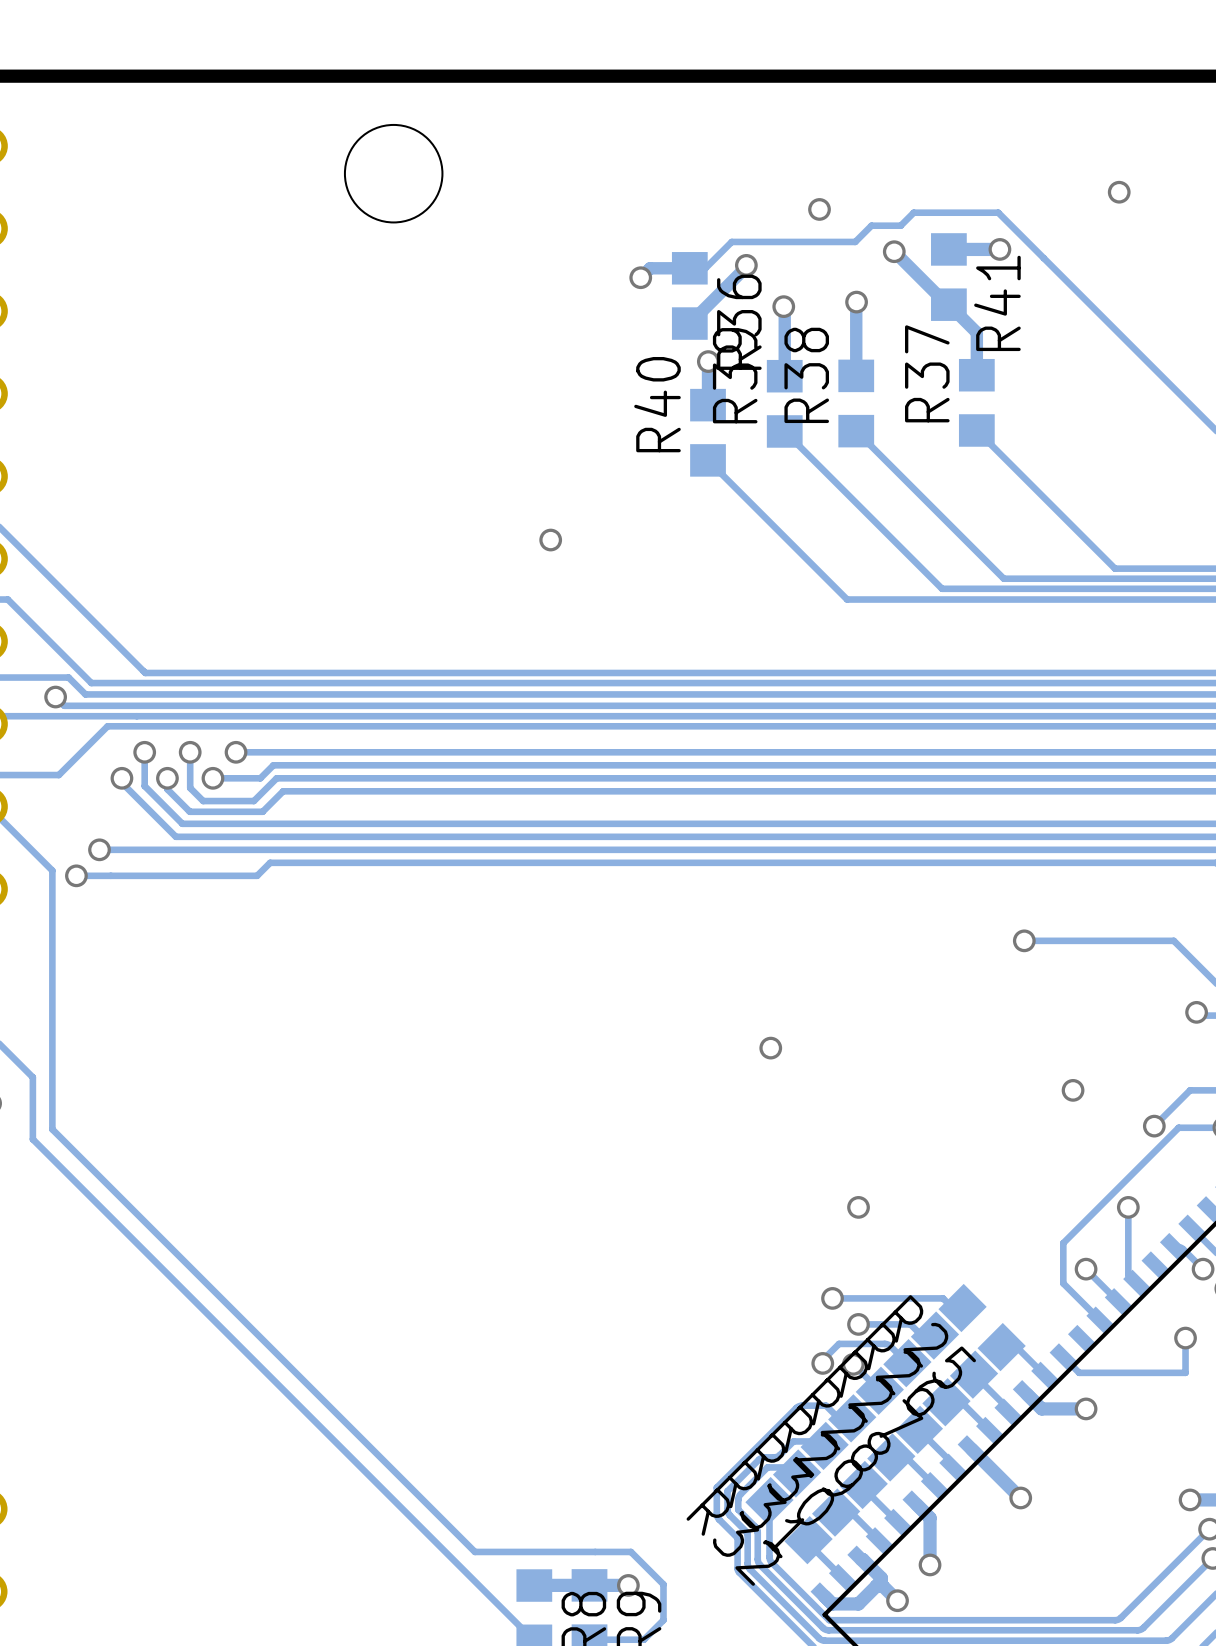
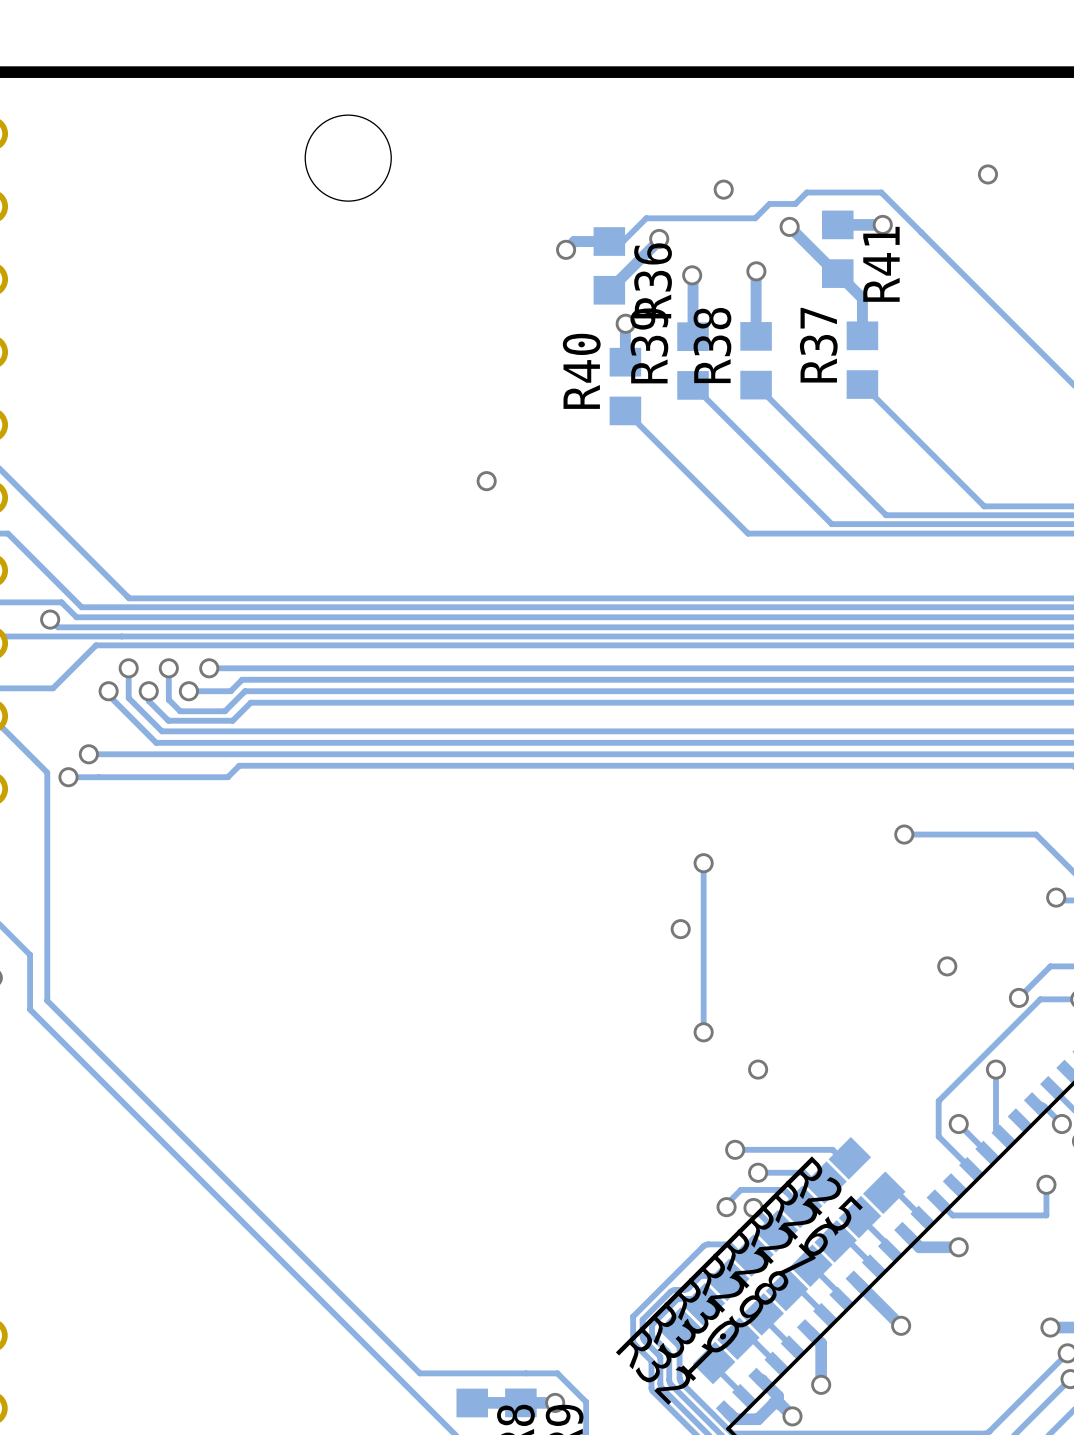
track: none -> (703, 863) (703, 1032)
via: none -> (703, 863)
via: none -> (703, 1032)

